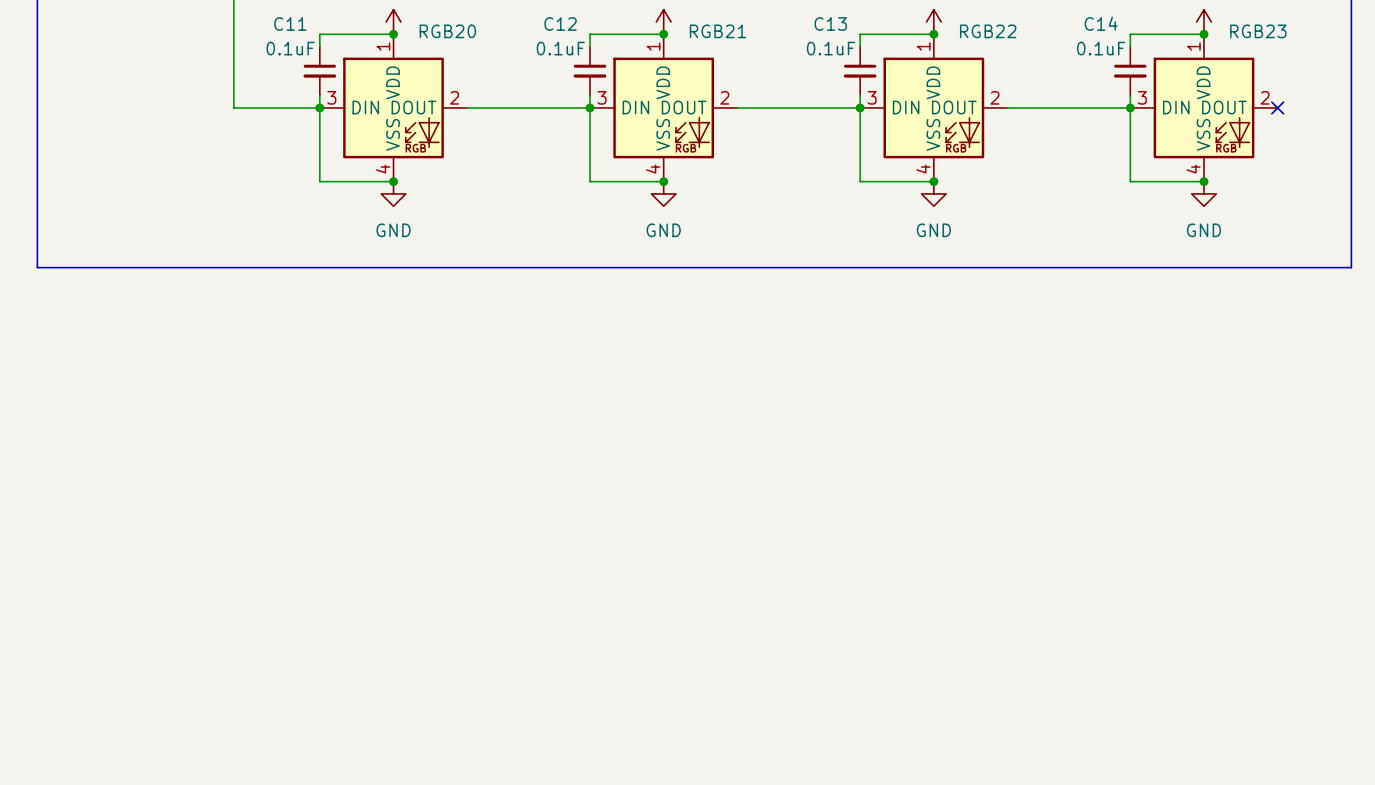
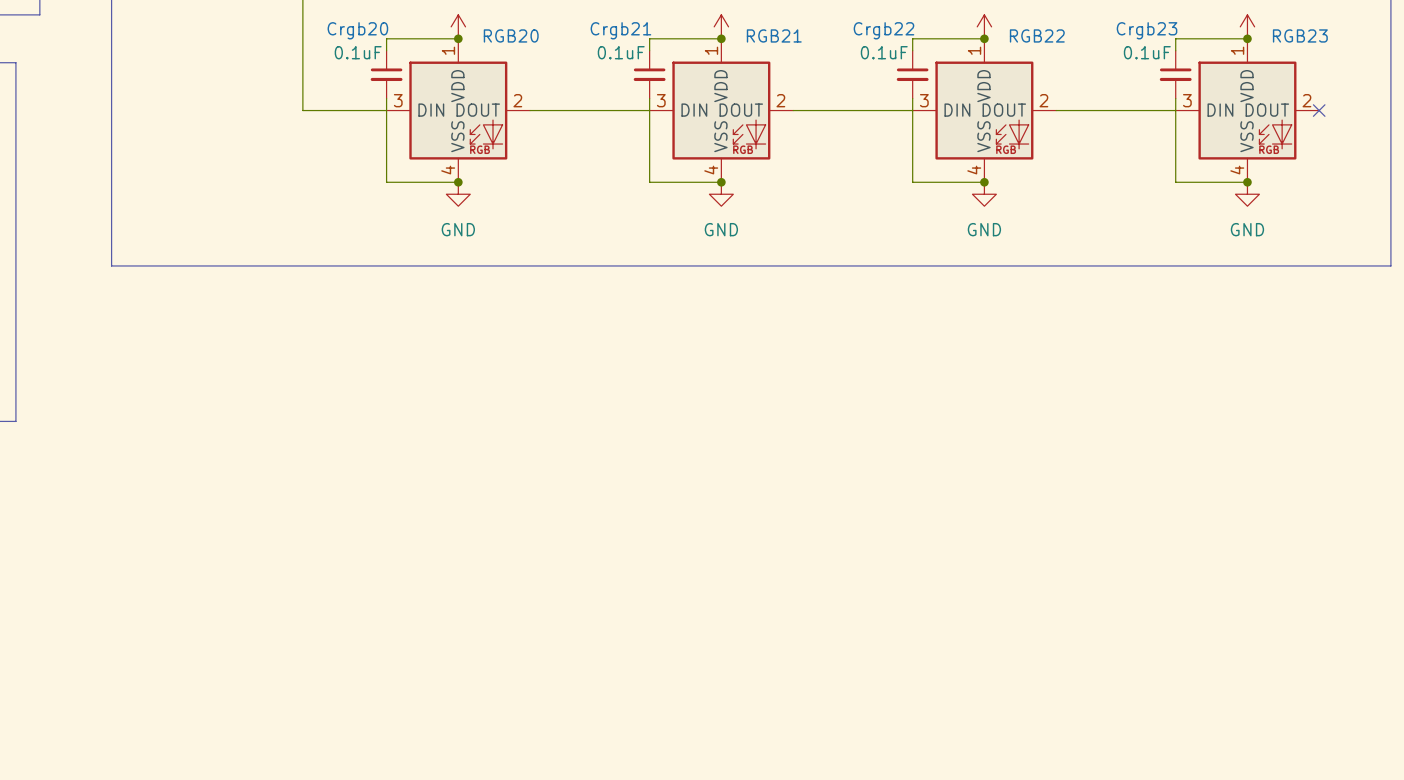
C14 name: C14 (1101, 23) -> Crgb23 (1147, 30)
C11 name: C11 (290, 24) -> Crgb20 (357, 30)
C12 name: C12 (560, 24) -> Crgb21 (620, 30)
C13 name: C13 (830, 24) -> Crgb22 (883, 30)
junction: (319, 107) -> none
junction: (590, 107) -> none
junction: (860, 107) -> none
junction: (1130, 107) -> none

